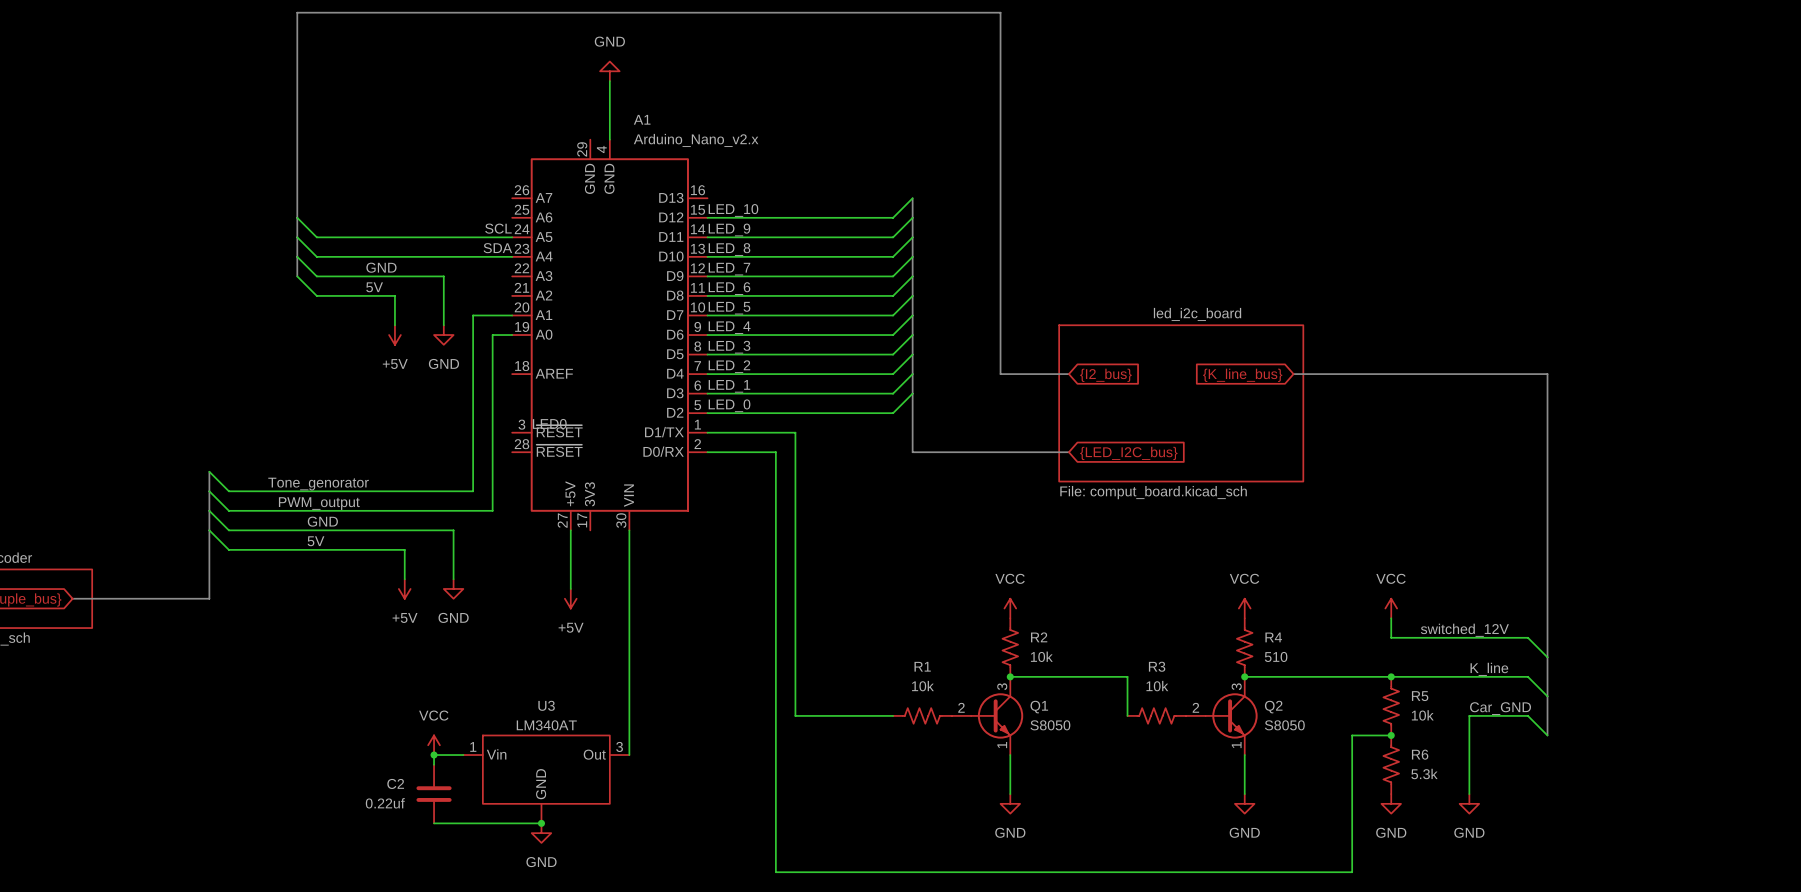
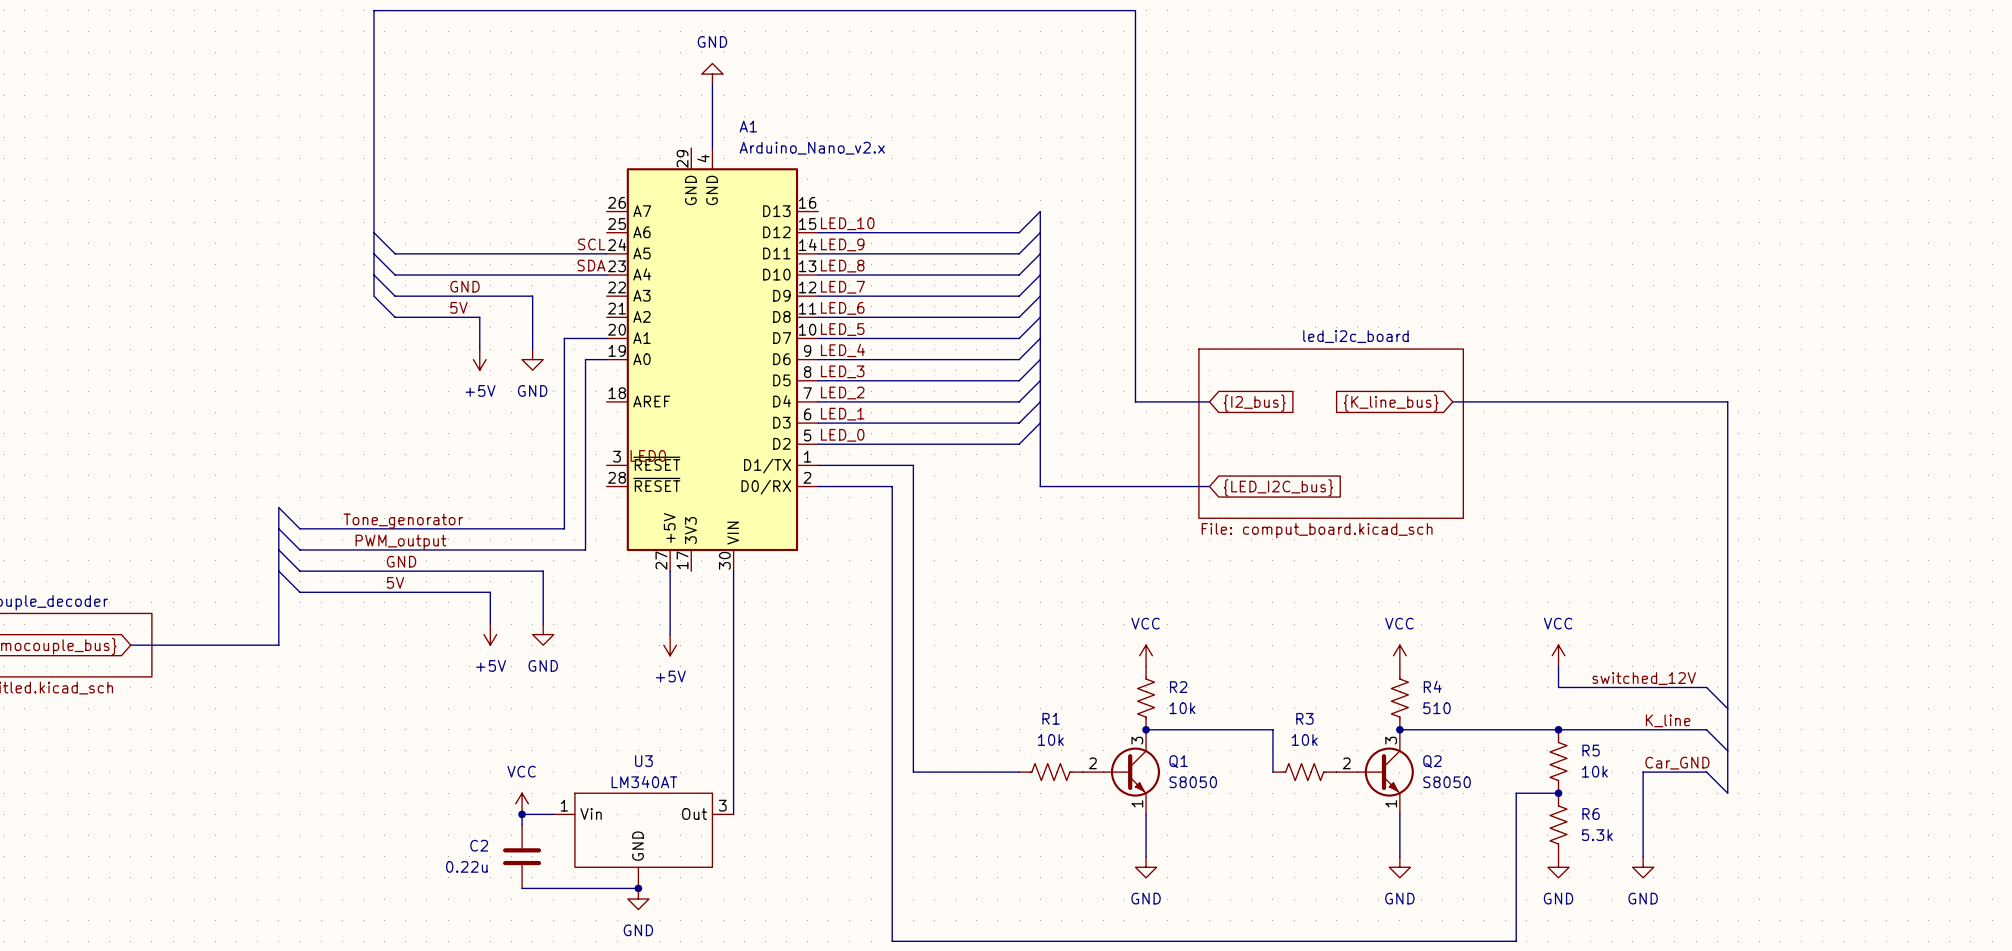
C2 value: 0.22uf (385, 803) -> 0.22u (466, 866)

